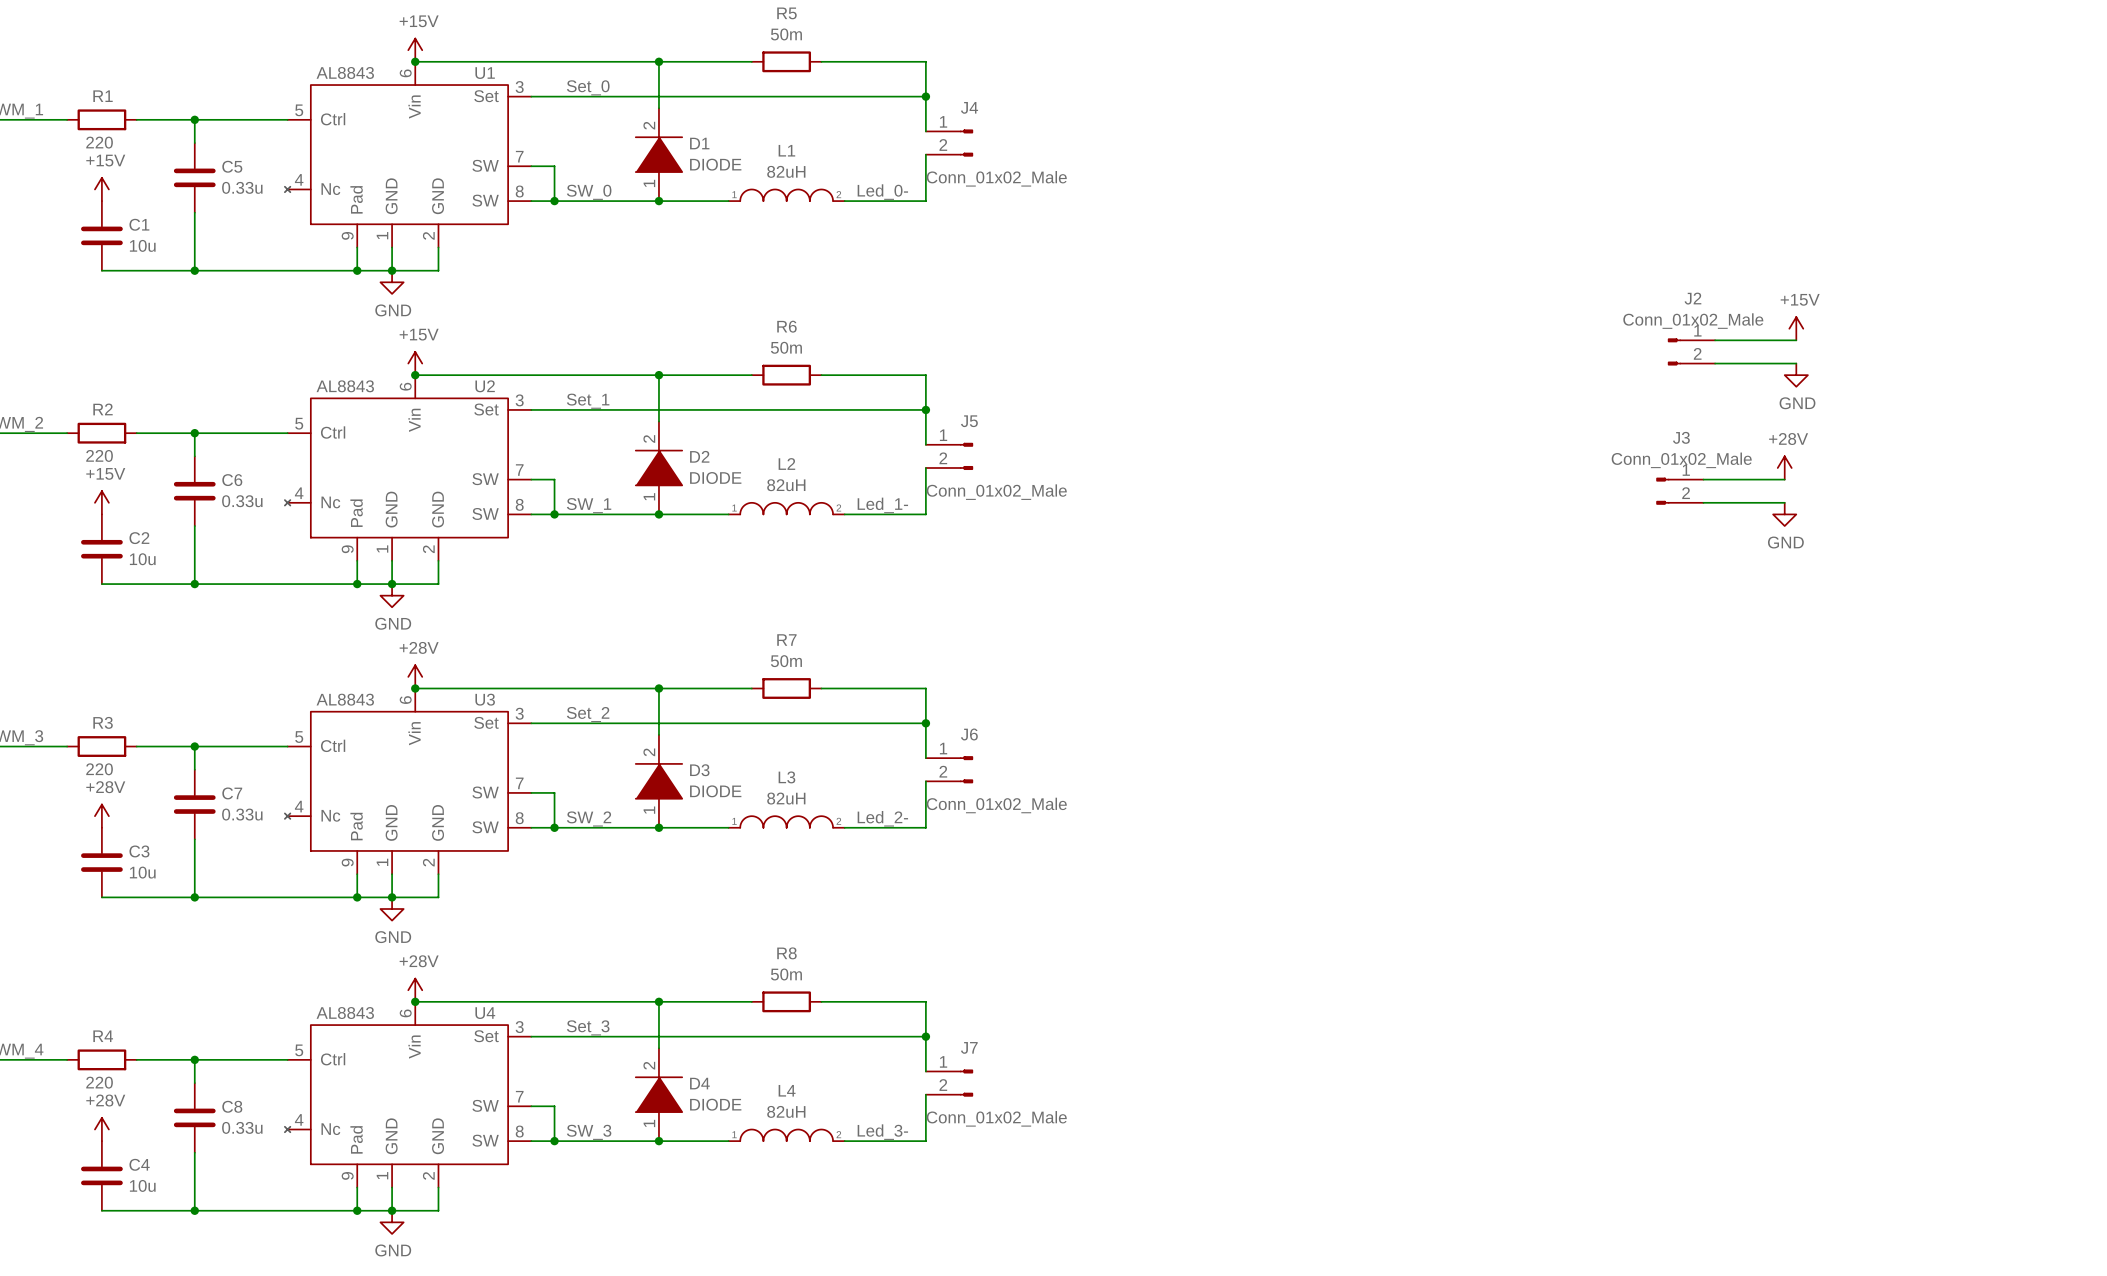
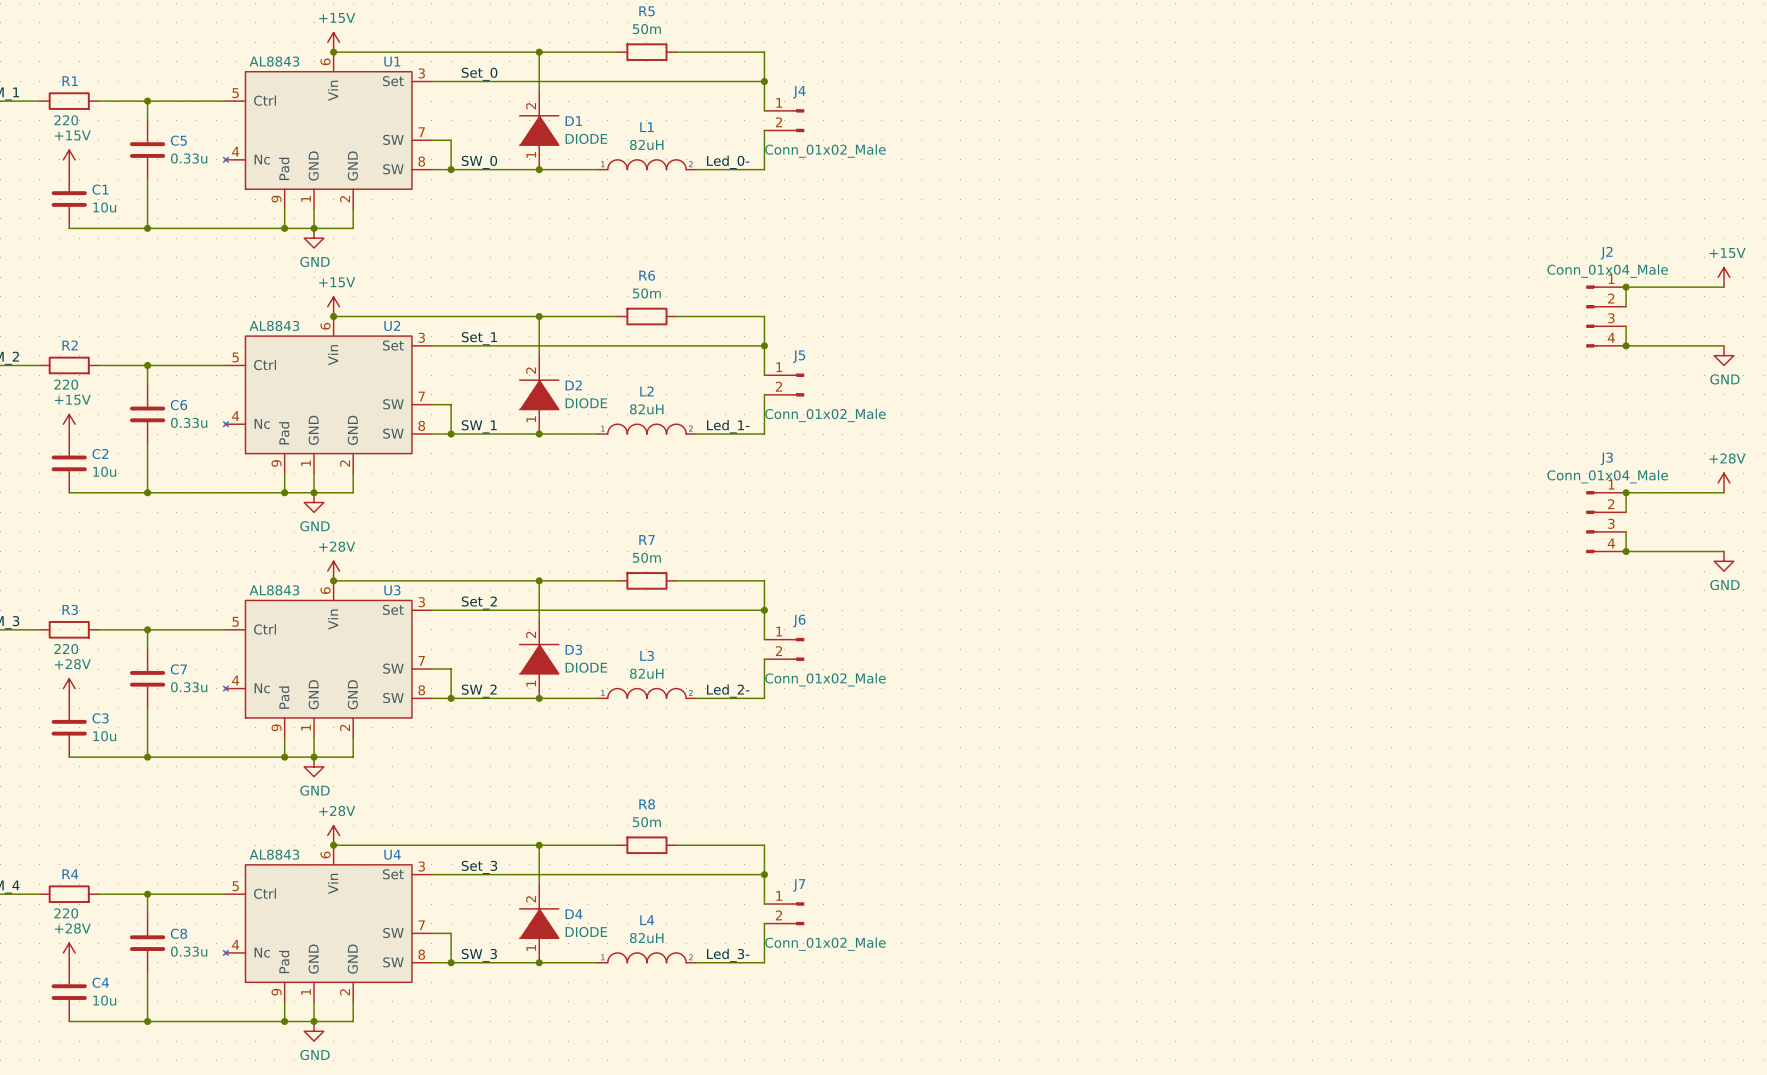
J2 name position: J2 (1692, 298) -> J2 (1606, 253)
J2 value: Conn_01x02_Male (1693, 321) -> Conn_01x04_Male (1607, 271)
power symbol: +15V (1796, 328) -> none
power symbol: none -> +15V (1723, 277)
J2 symbol: [1667, 338, 1716, 366] -> [1586, 285, 1627, 348]
wire: (1715, 340) (1796, 340) -> none
junction: none -> (1626, 287)
wire: none -> (1723, 287) (1626, 287) (1626, 306)
wire: (1715, 363) (1796, 363) -> none
power symbol: GND (1796, 375) -> none
wire: none -> (1626, 326) (1626, 345) (1723, 345)
junction: none -> (1626, 345)
power symbol: none -> GND (1723, 355)
J3 name position: J3 (1681, 437) -> J3 (1606, 458)
J3 value: Conn_01x02_Male (1681, 460) -> Conn_01x04_Male (1607, 476)
power symbol: +28V (1784, 467) -> none
J3 symbol: [1656, 477, 1704, 505] -> [1586, 491, 1627, 554]
wire: (1703, 479) (1784, 479) -> none
wire: (1703, 502) (1784, 502) -> none
power symbol: GND (1784, 514) -> none
power symbol: none -> +28V (1723, 482)
junction: none -> (1626, 492)
wire: none -> (1723, 492) (1626, 492) (1626, 512)
wire: none -> (1626, 531) (1626, 551) (1723, 551)
junction: none -> (1626, 551)
power symbol: none -> GND (1723, 561)

